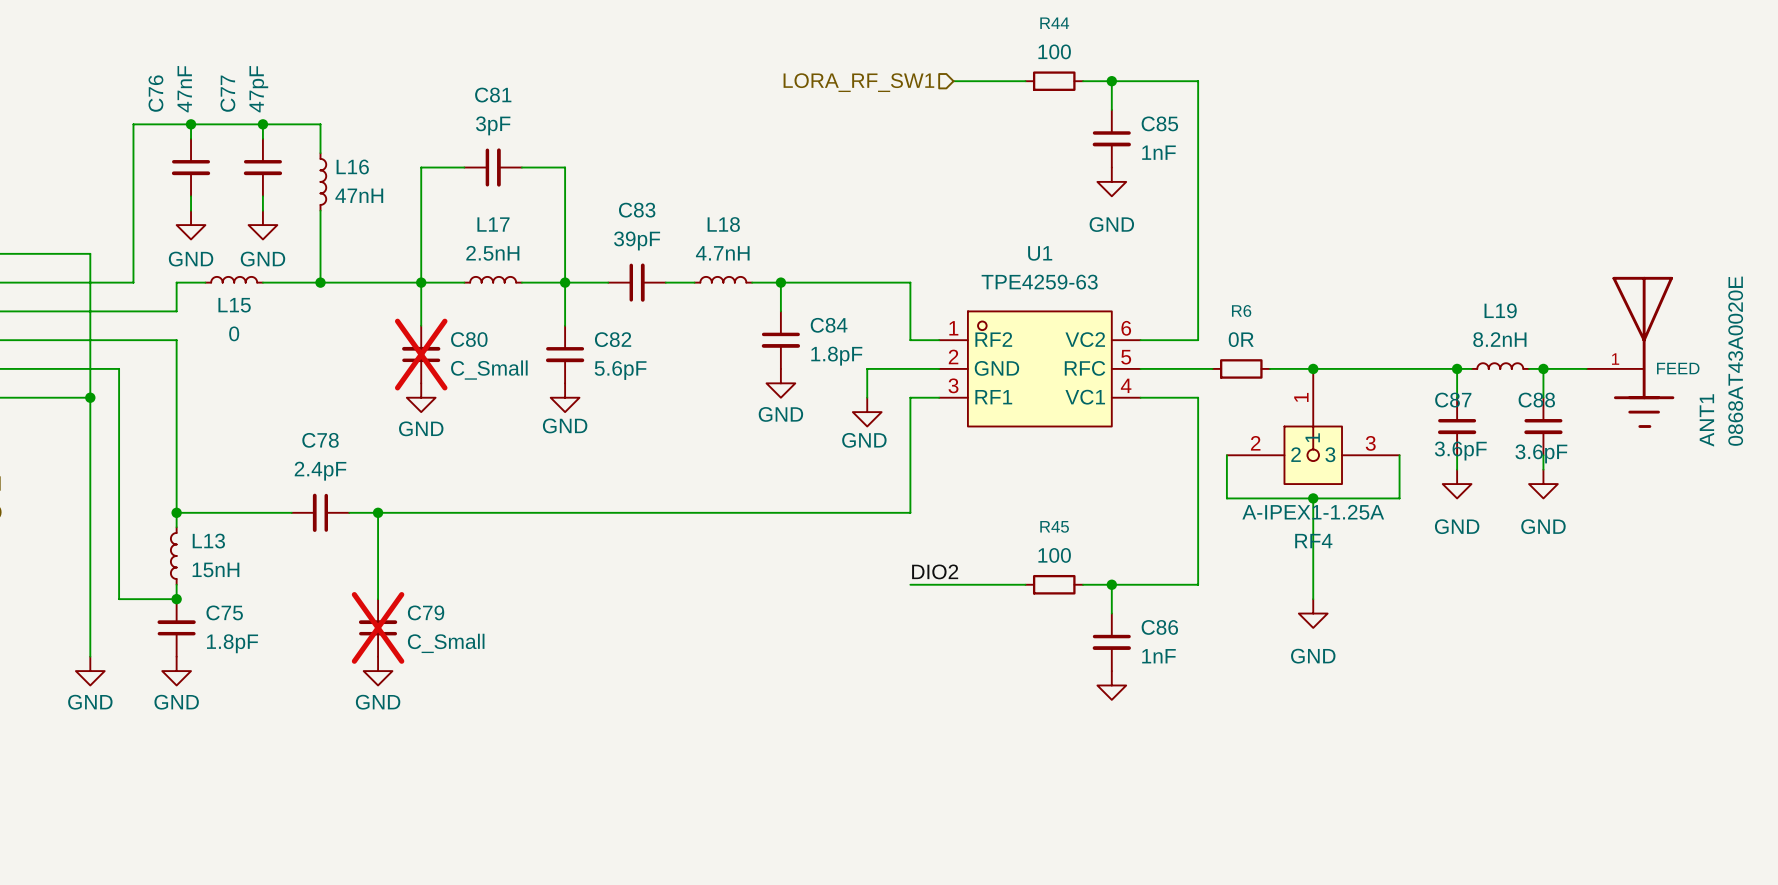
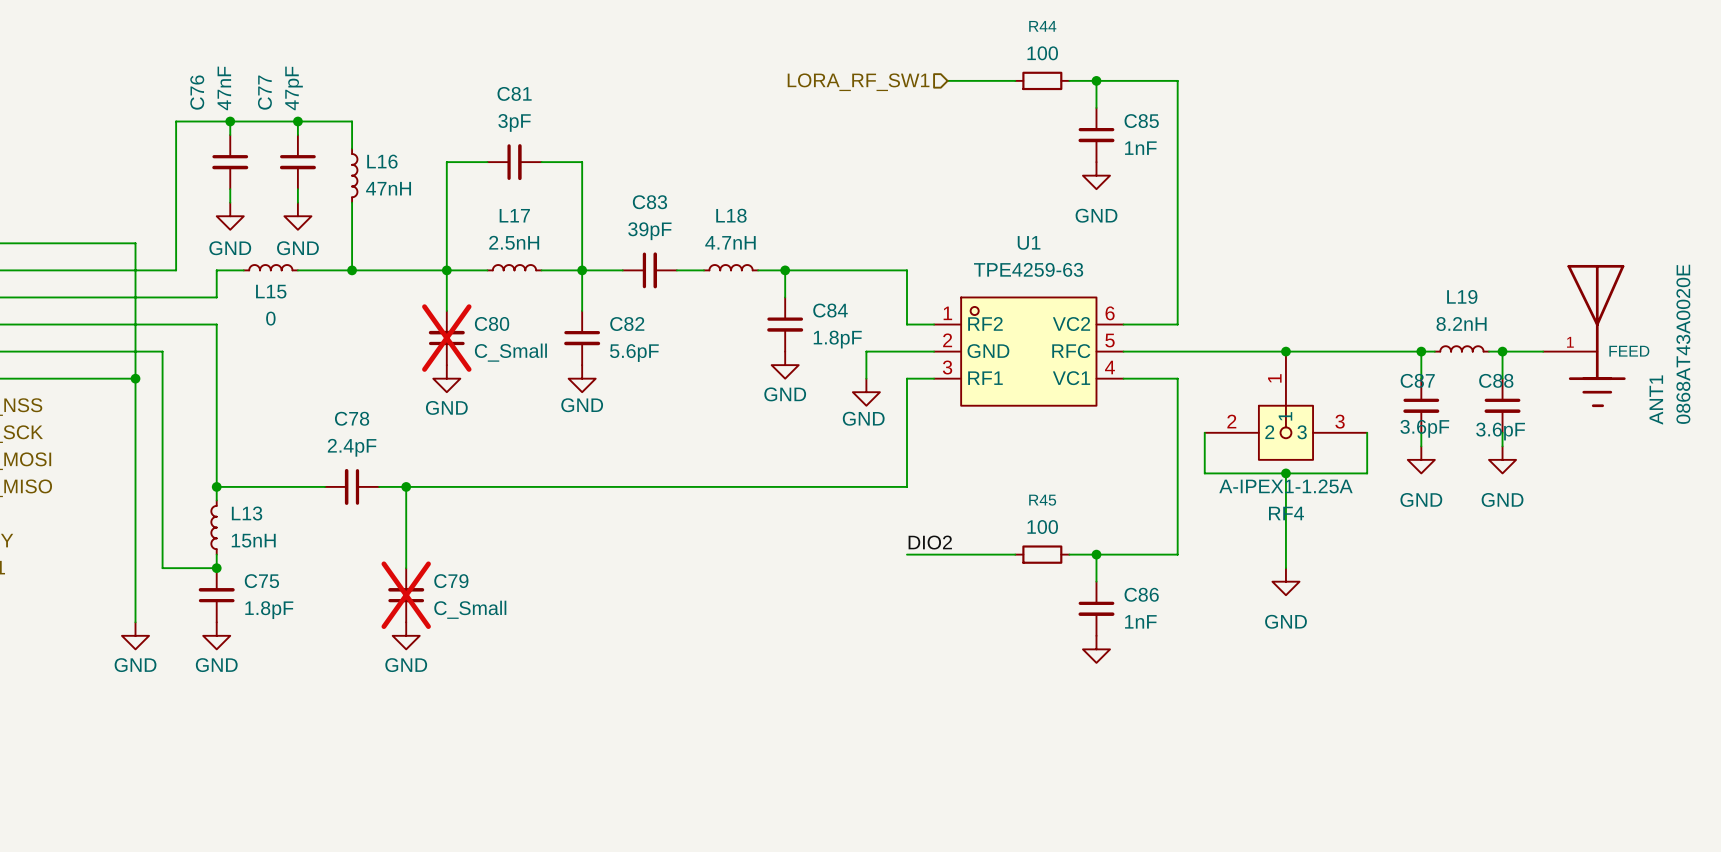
wire: none -> (1191, 351) (1245, 351)
R6: 0R (1241, 368) -> none

